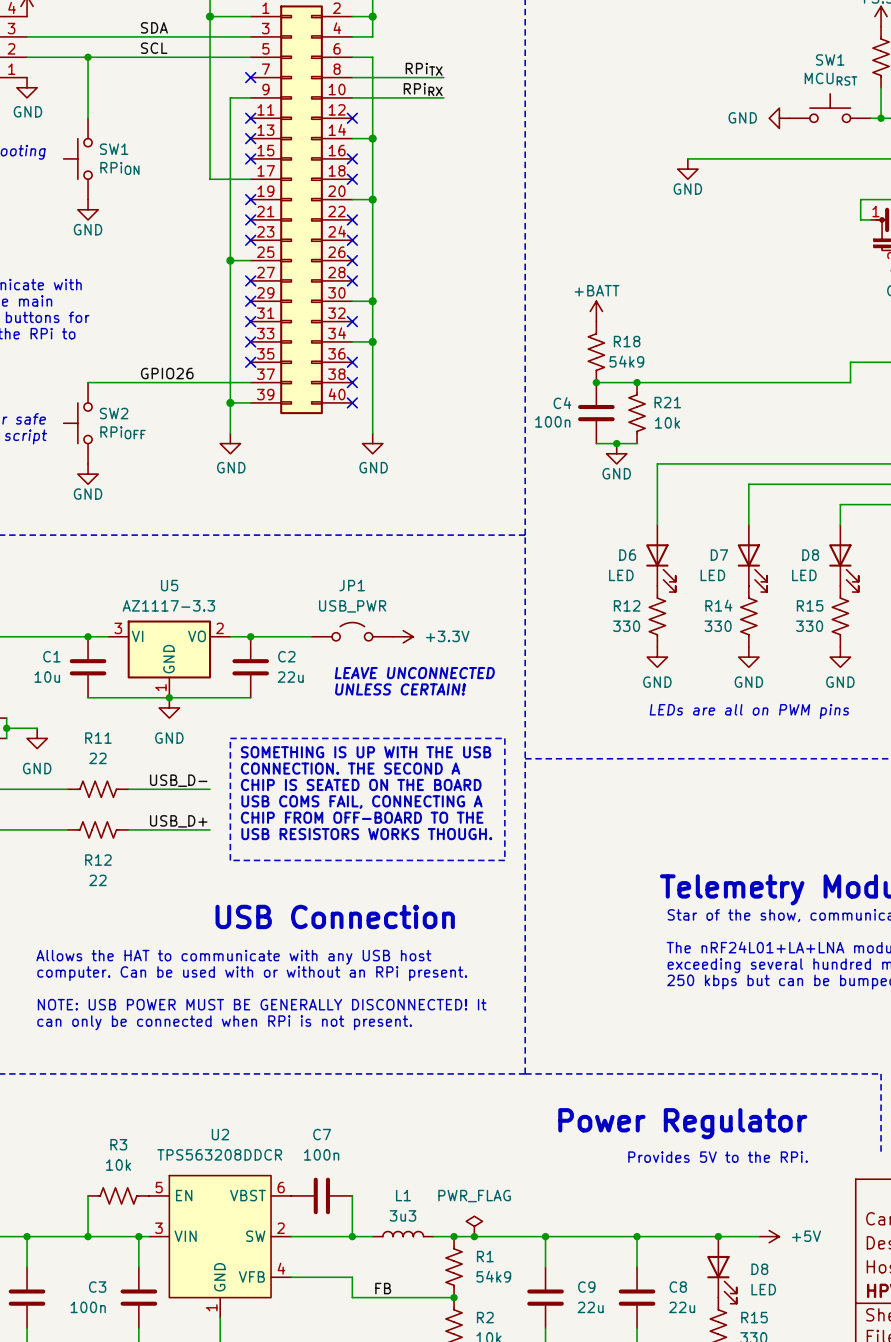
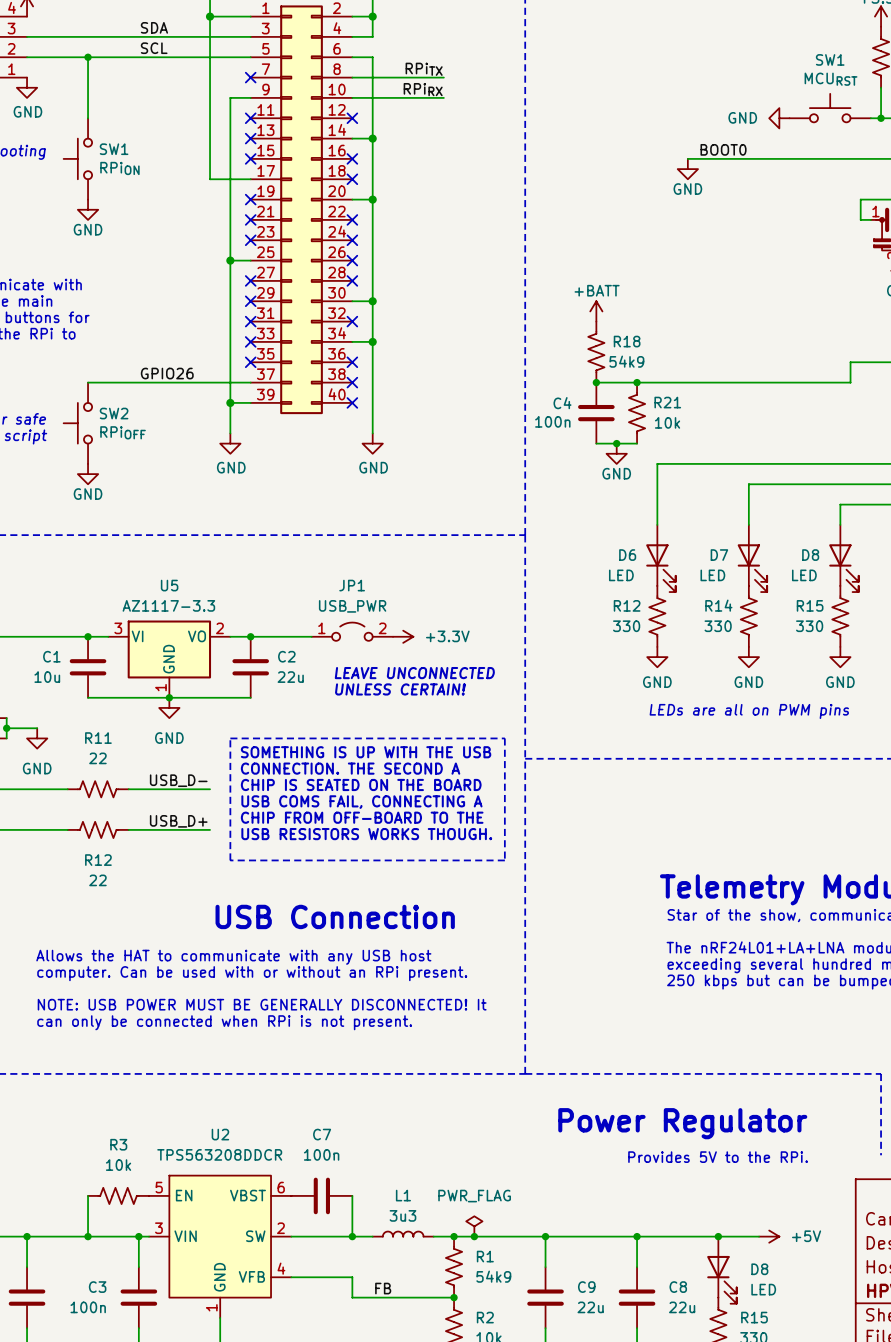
label: none -> BOOT0 (723, 149)
JP1 pin number: none -> 1 (321, 628)
JP1 pin number: none -> 2 (382, 628)

